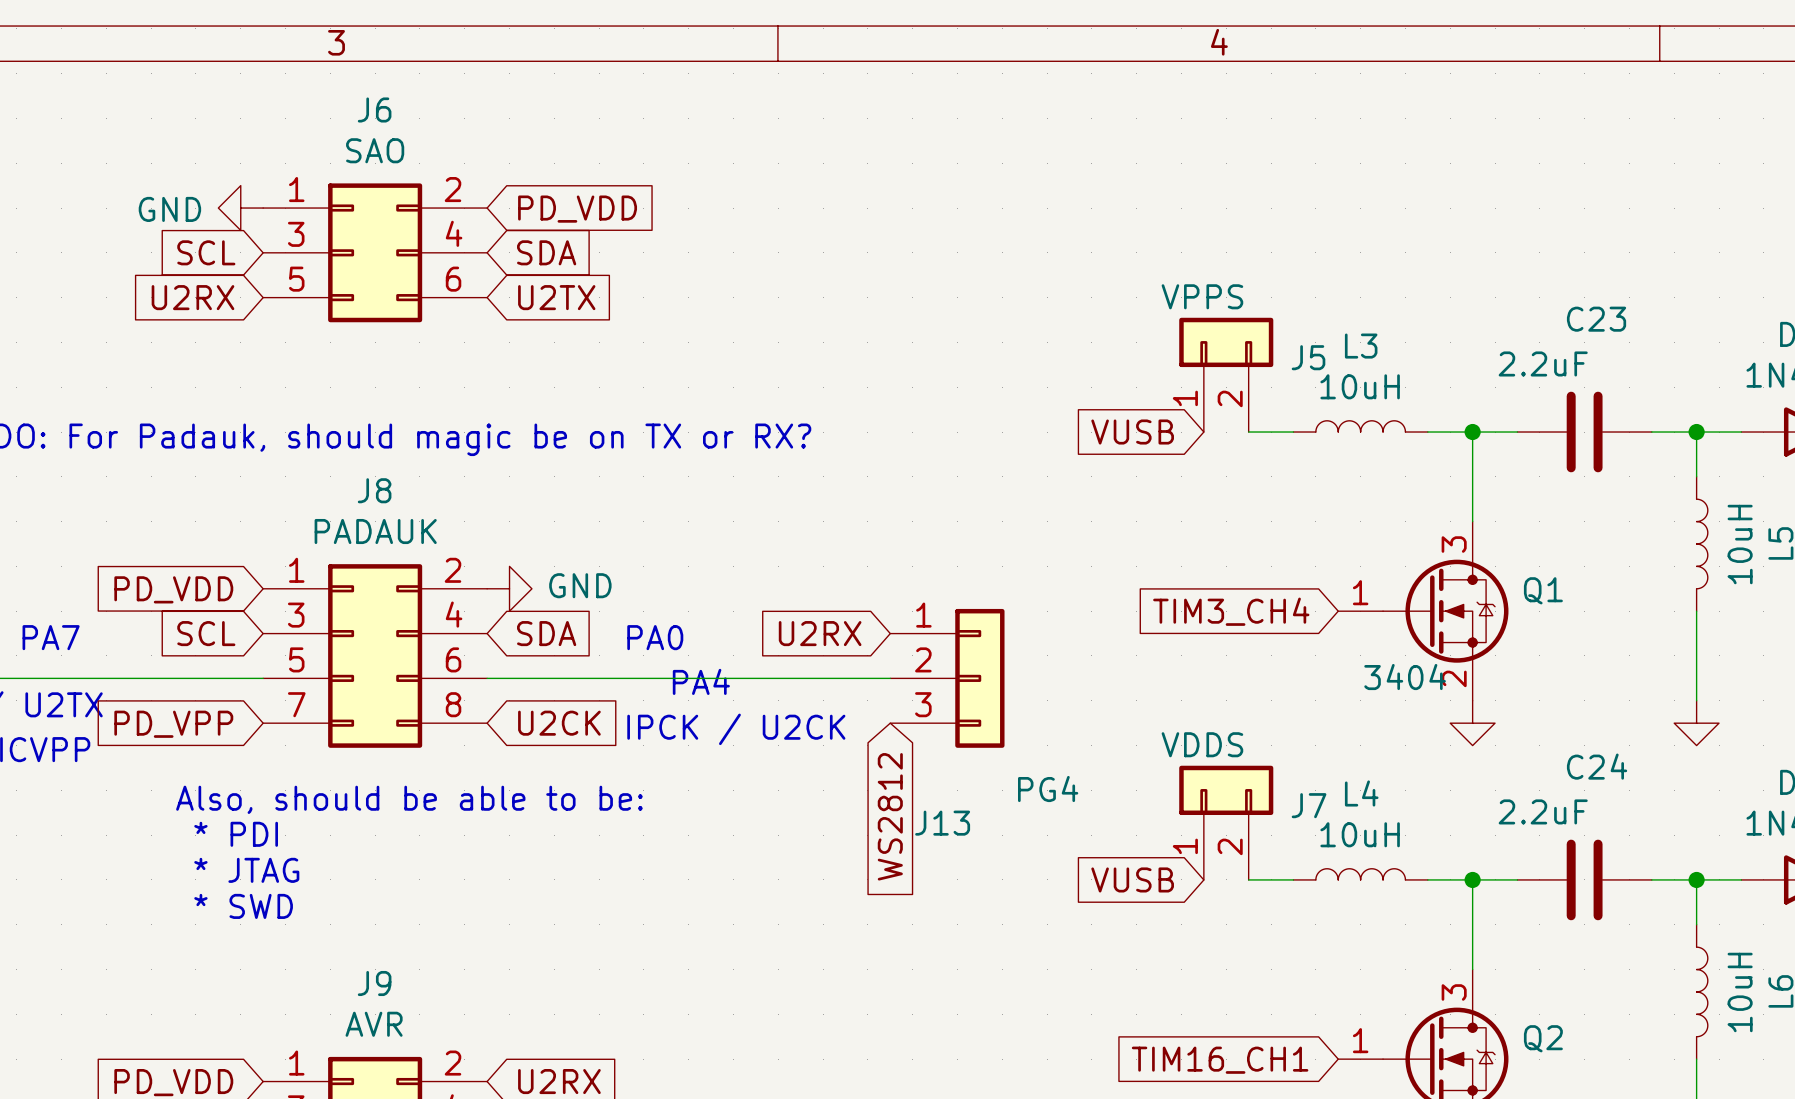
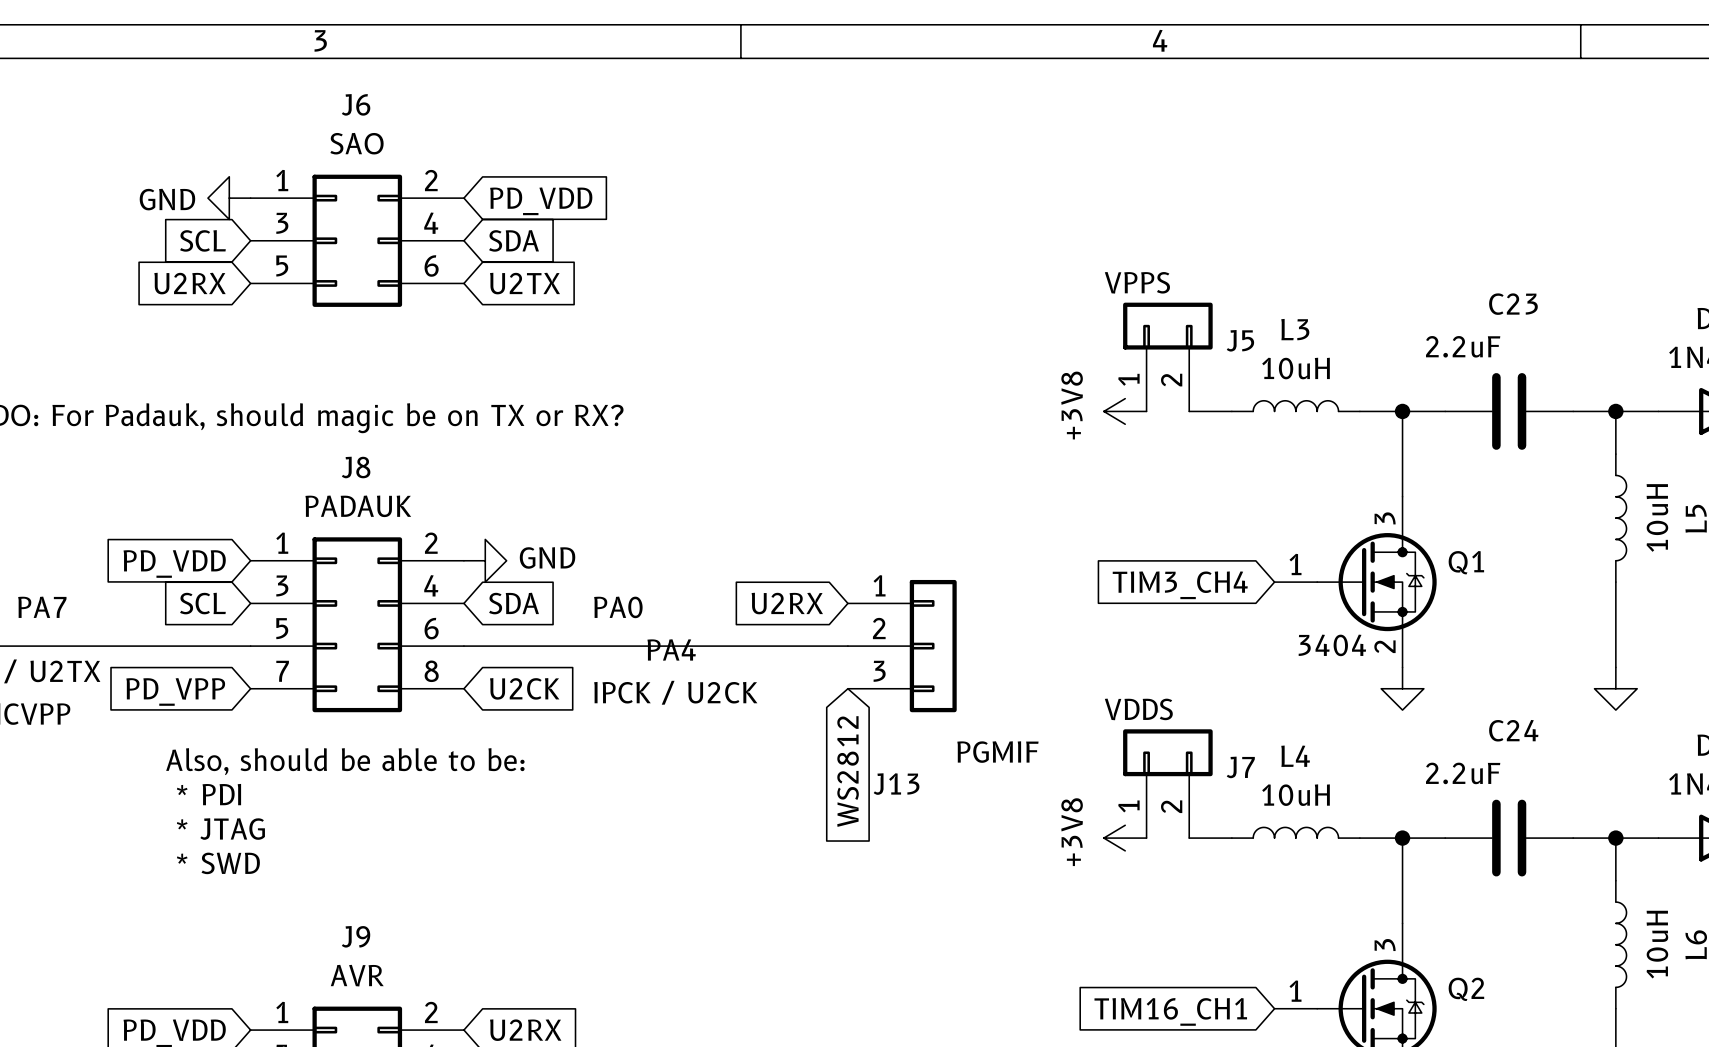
global label: VUSB (1132, 432) -> none
power symbol: none -> +3V8 (1125, 411)
J13 value: PG4 (1048, 789) -> PGMIF (997, 752)
global label: VUSB (1132, 879) -> none
power symbol: none -> +3V8 (1125, 838)

